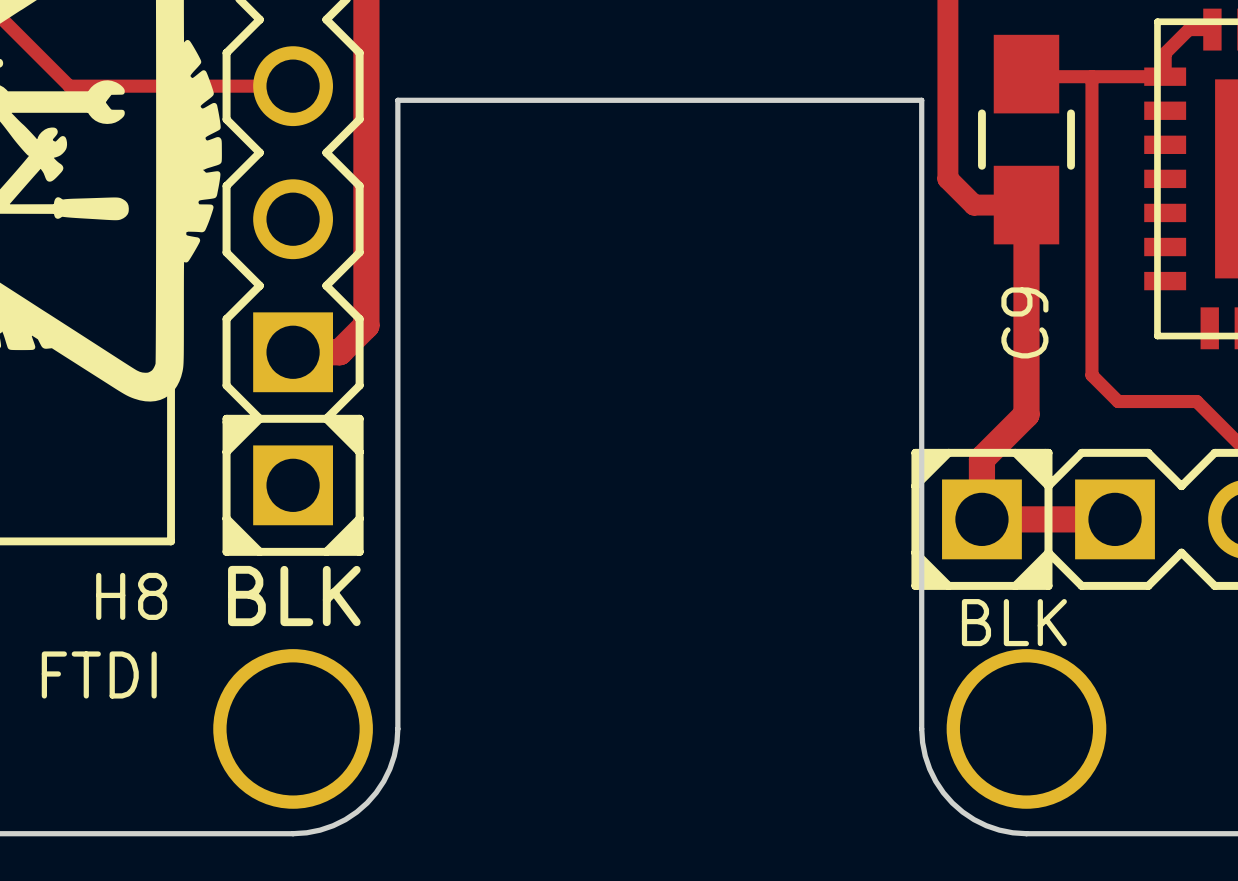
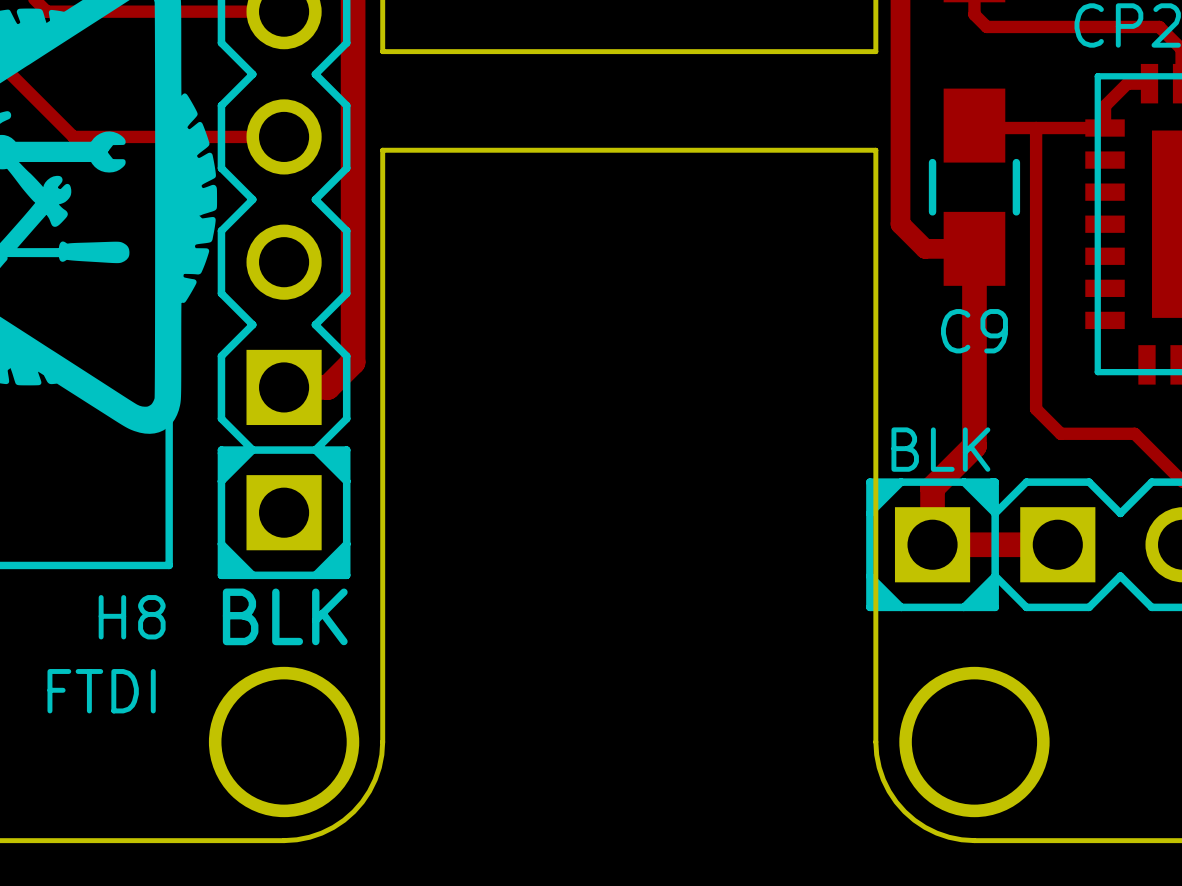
C9 name rotation: 0° (1024, 322) -> 90° clockwise (974, 331)
part text position: BLK (1014, 622) -> BLK (940, 449)

